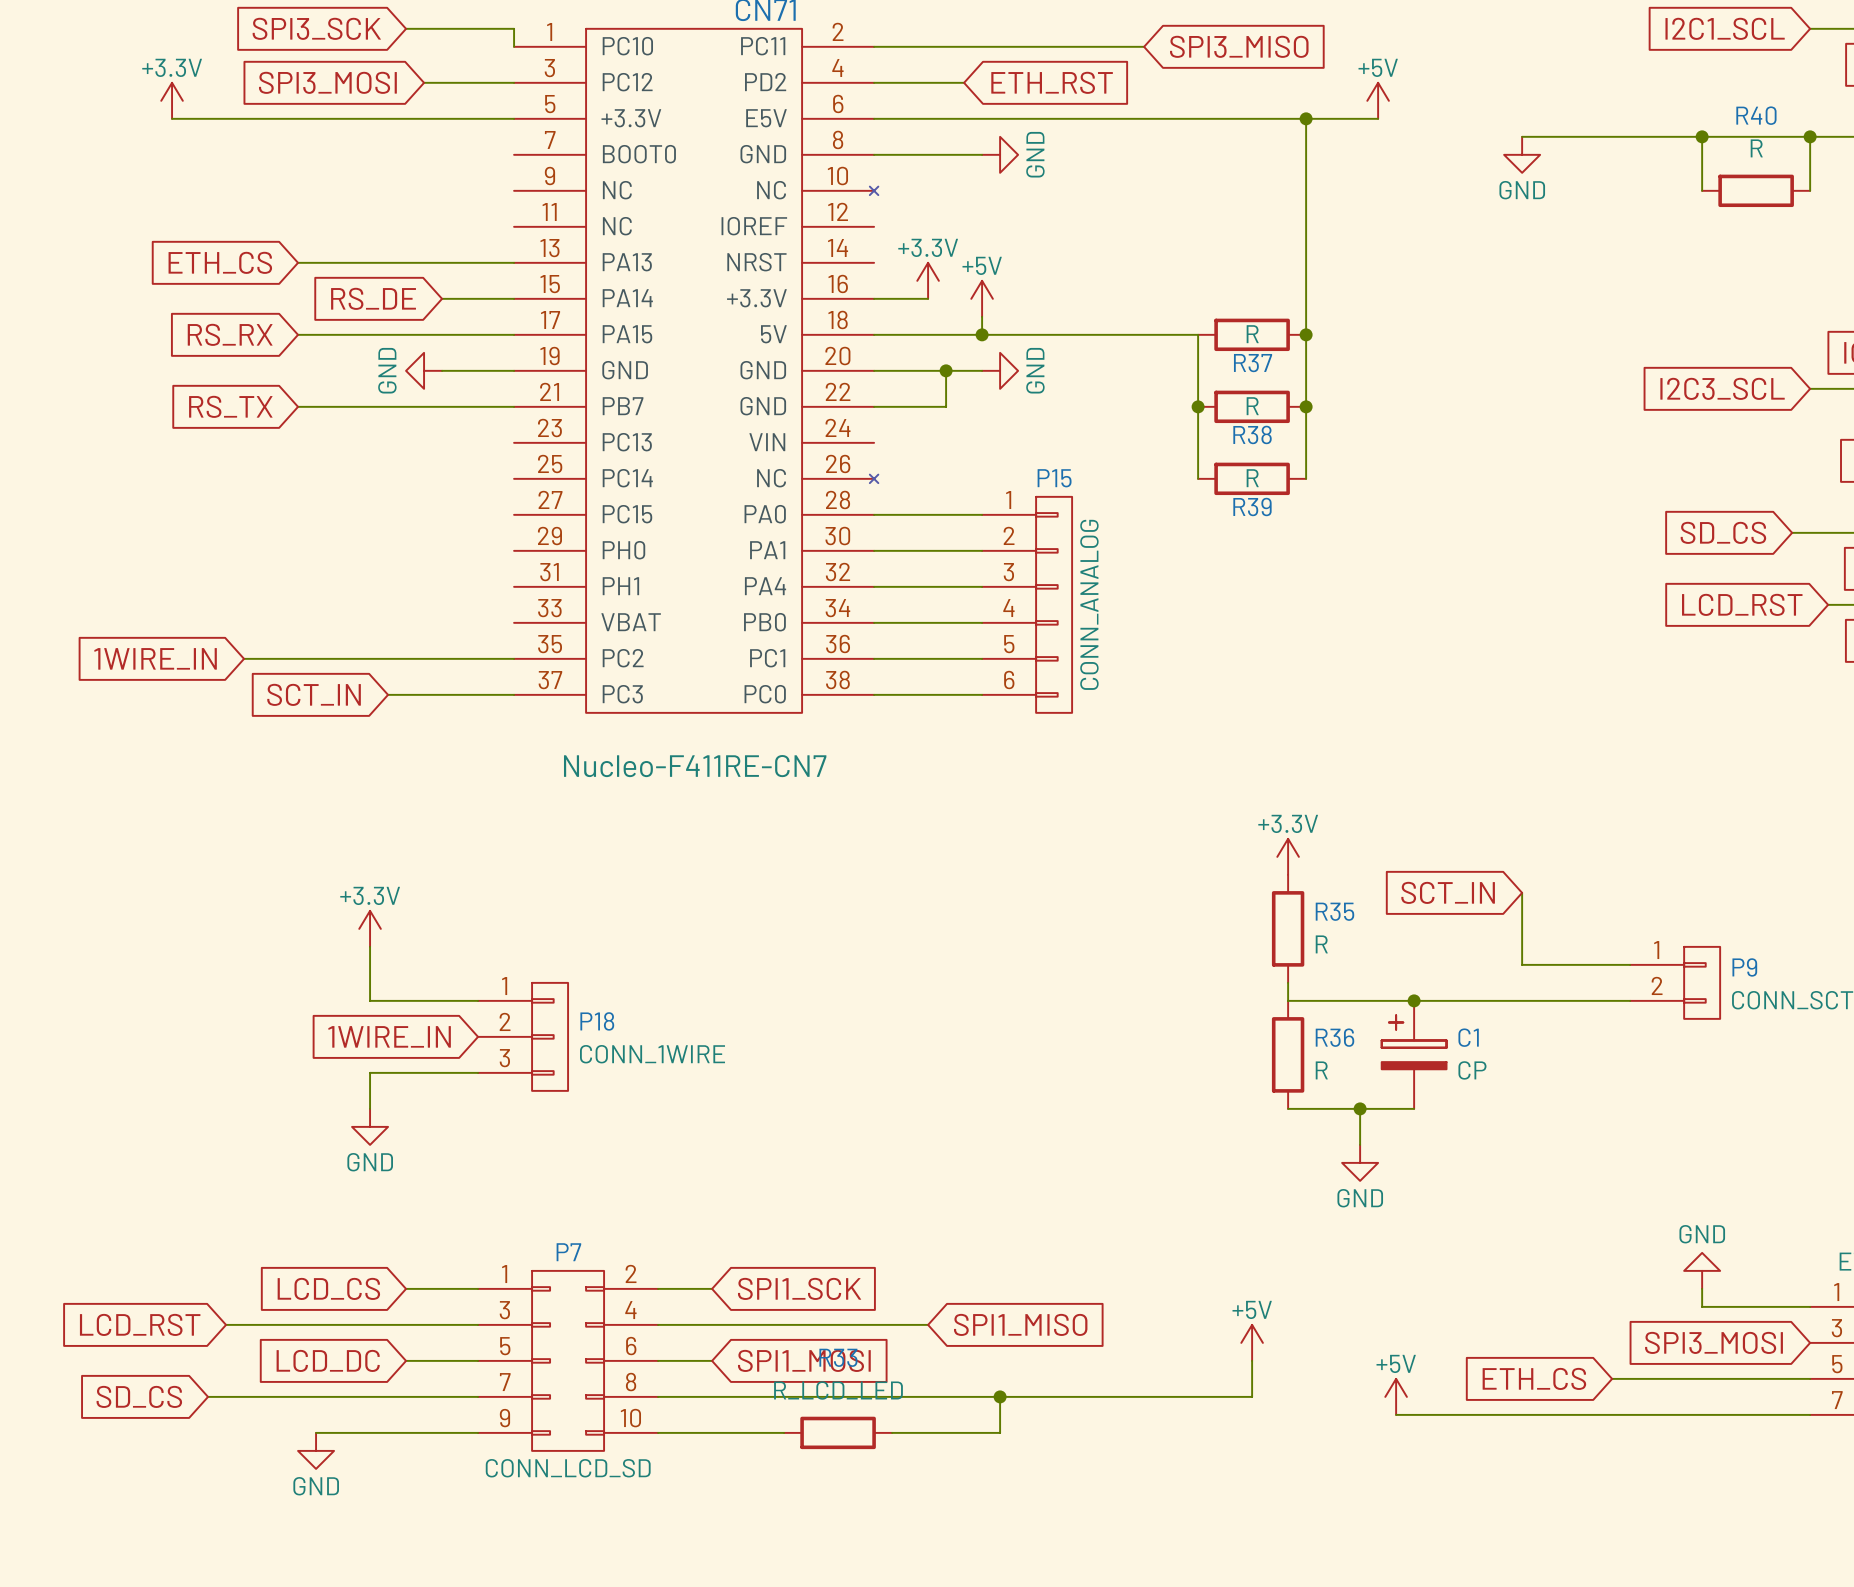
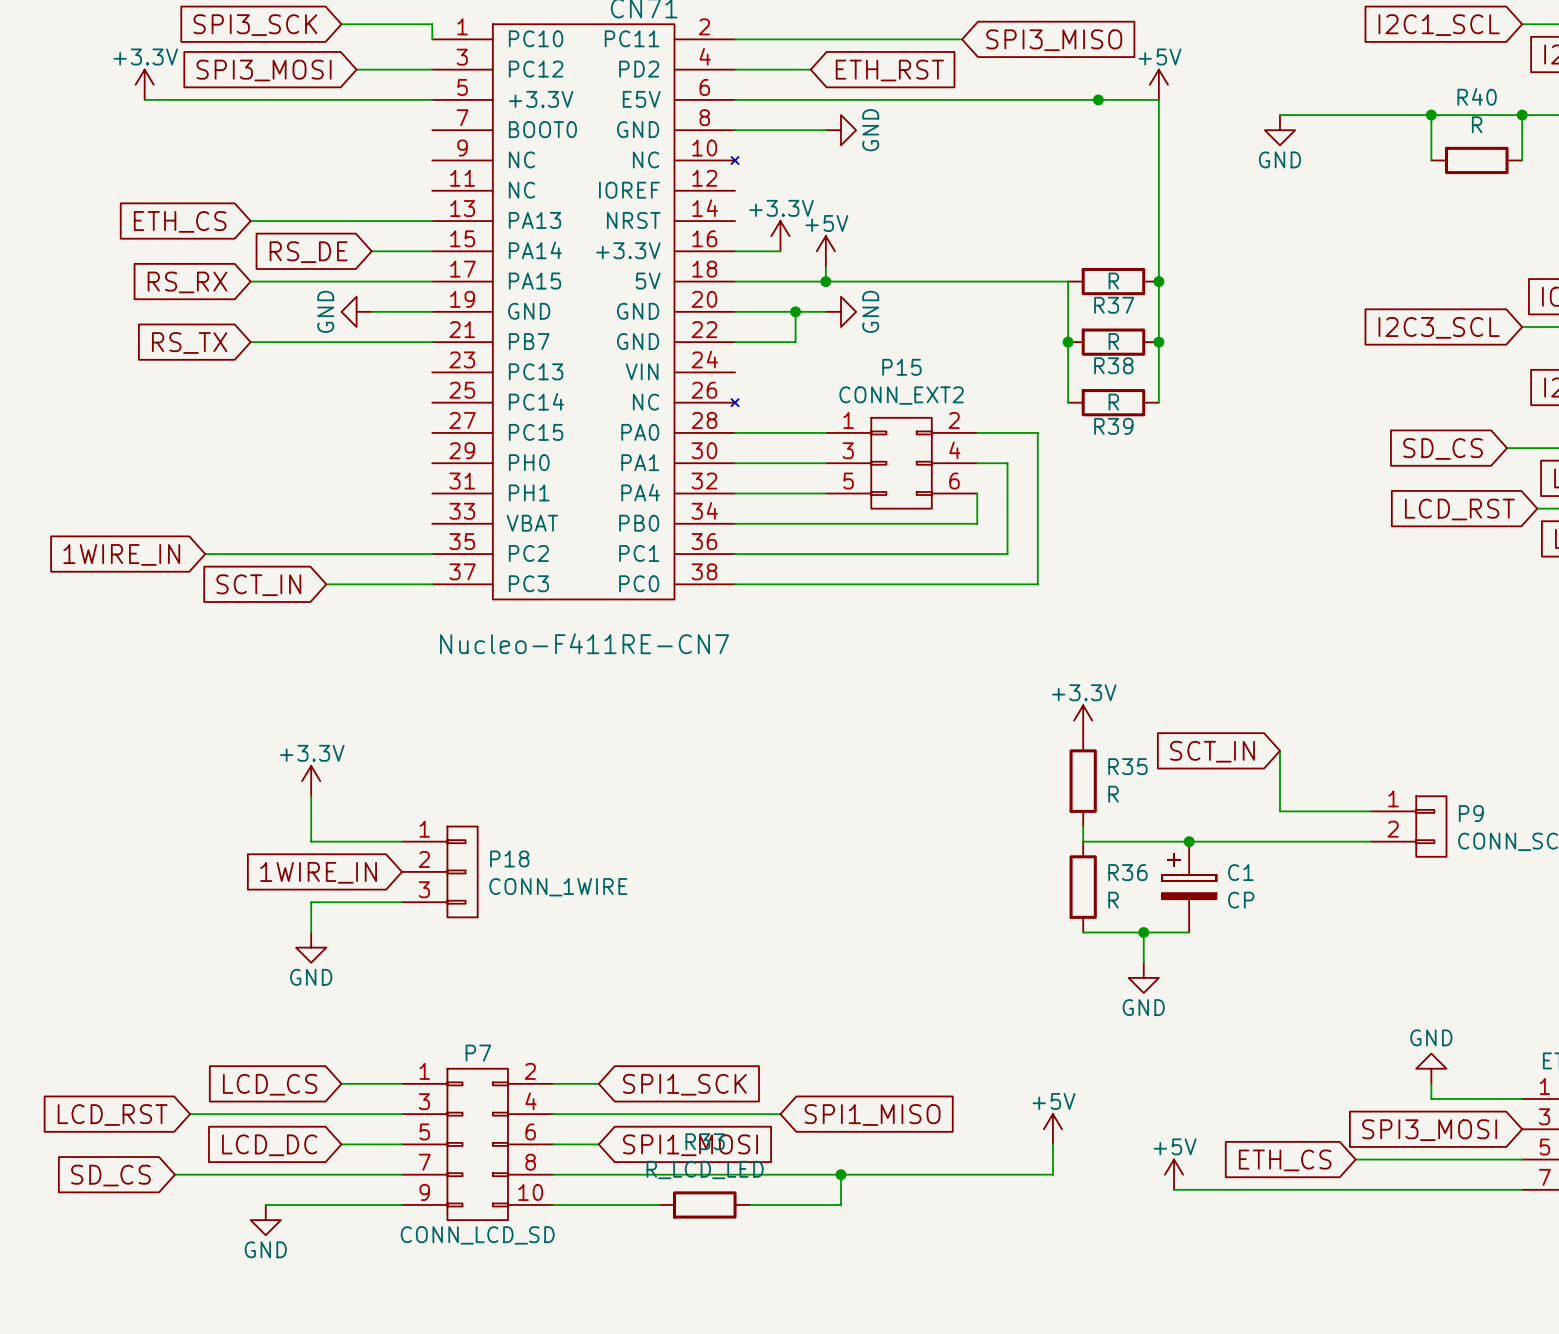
wire: (1306, 118) (1306, 478) -> (1158, 99) (1158, 402)
wire: (1198, 334) (1198, 478) -> (1007, 281) (1068, 281) (1068, 402)
R37 position: (1252, 334) -> (1113, 281)
junction: (1306, 334) -> none
junction: none -> (1158, 281)
junction: (1198, 406) -> none
R38 position: (1252, 406) -> (1113, 342)
junction: none -> (1068, 342)
junction: (1306, 406) -> none
junction: none -> (1158, 342)
P15 name position: P15 (1054, 478) -> P15 (901, 367)
R39 position: (1252, 478) -> (1113, 402)
P15 symbol: [982, 496, 1073, 713] -> [825, 417, 978, 509]
wire: none -> (977, 432) (1037, 432) (1037, 584) (825, 584)
wire: none -> (977, 463) (1007, 463) (1007, 554) (825, 554)
wire: none -> (977, 493) (977, 523) (825, 523)
P15 value: CONN_ANALOG (1089, 604) -> CONN_EXT2 (901, 395)

